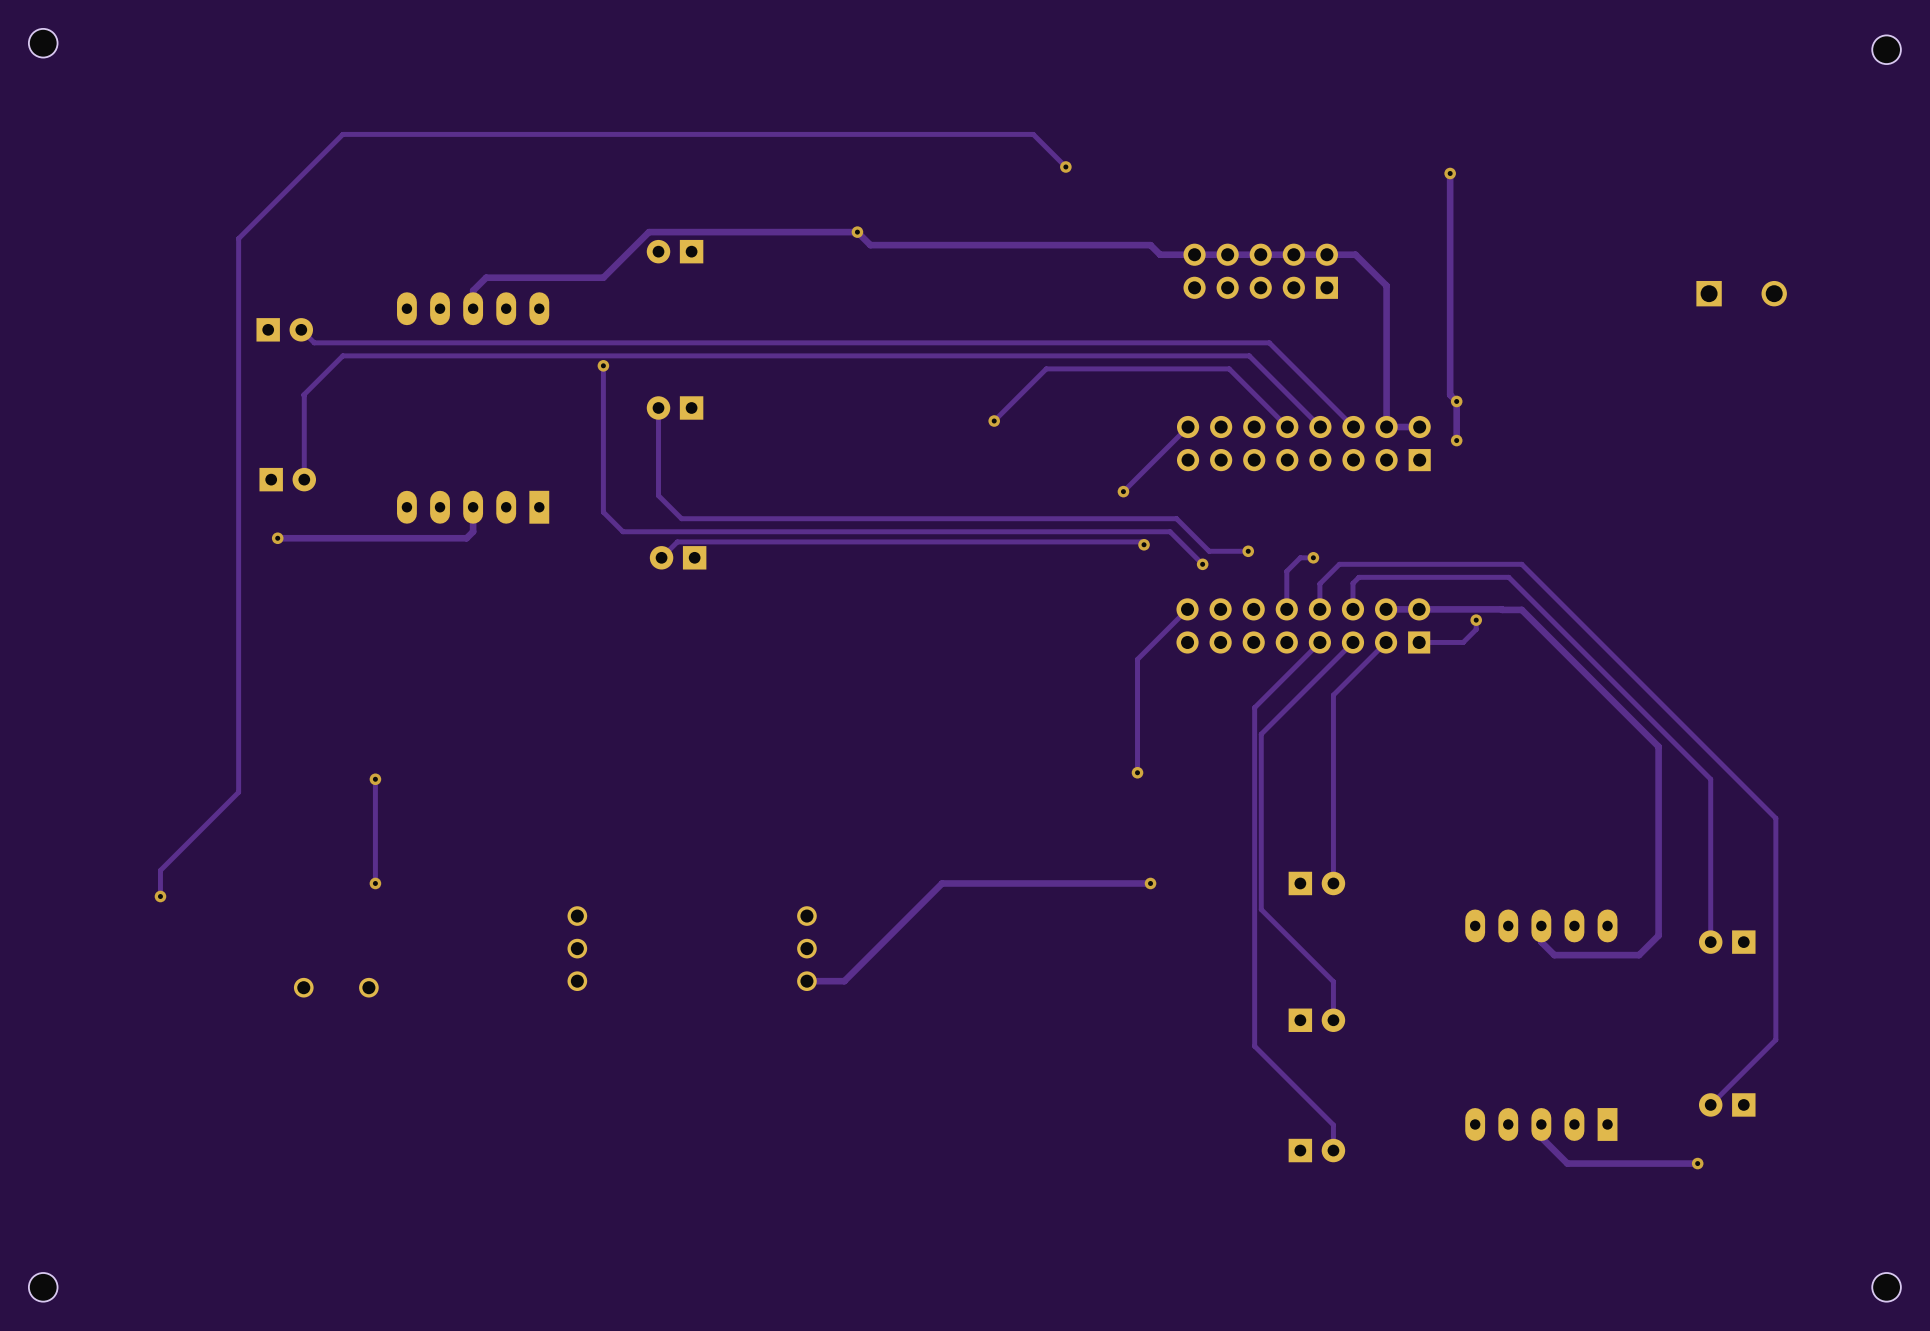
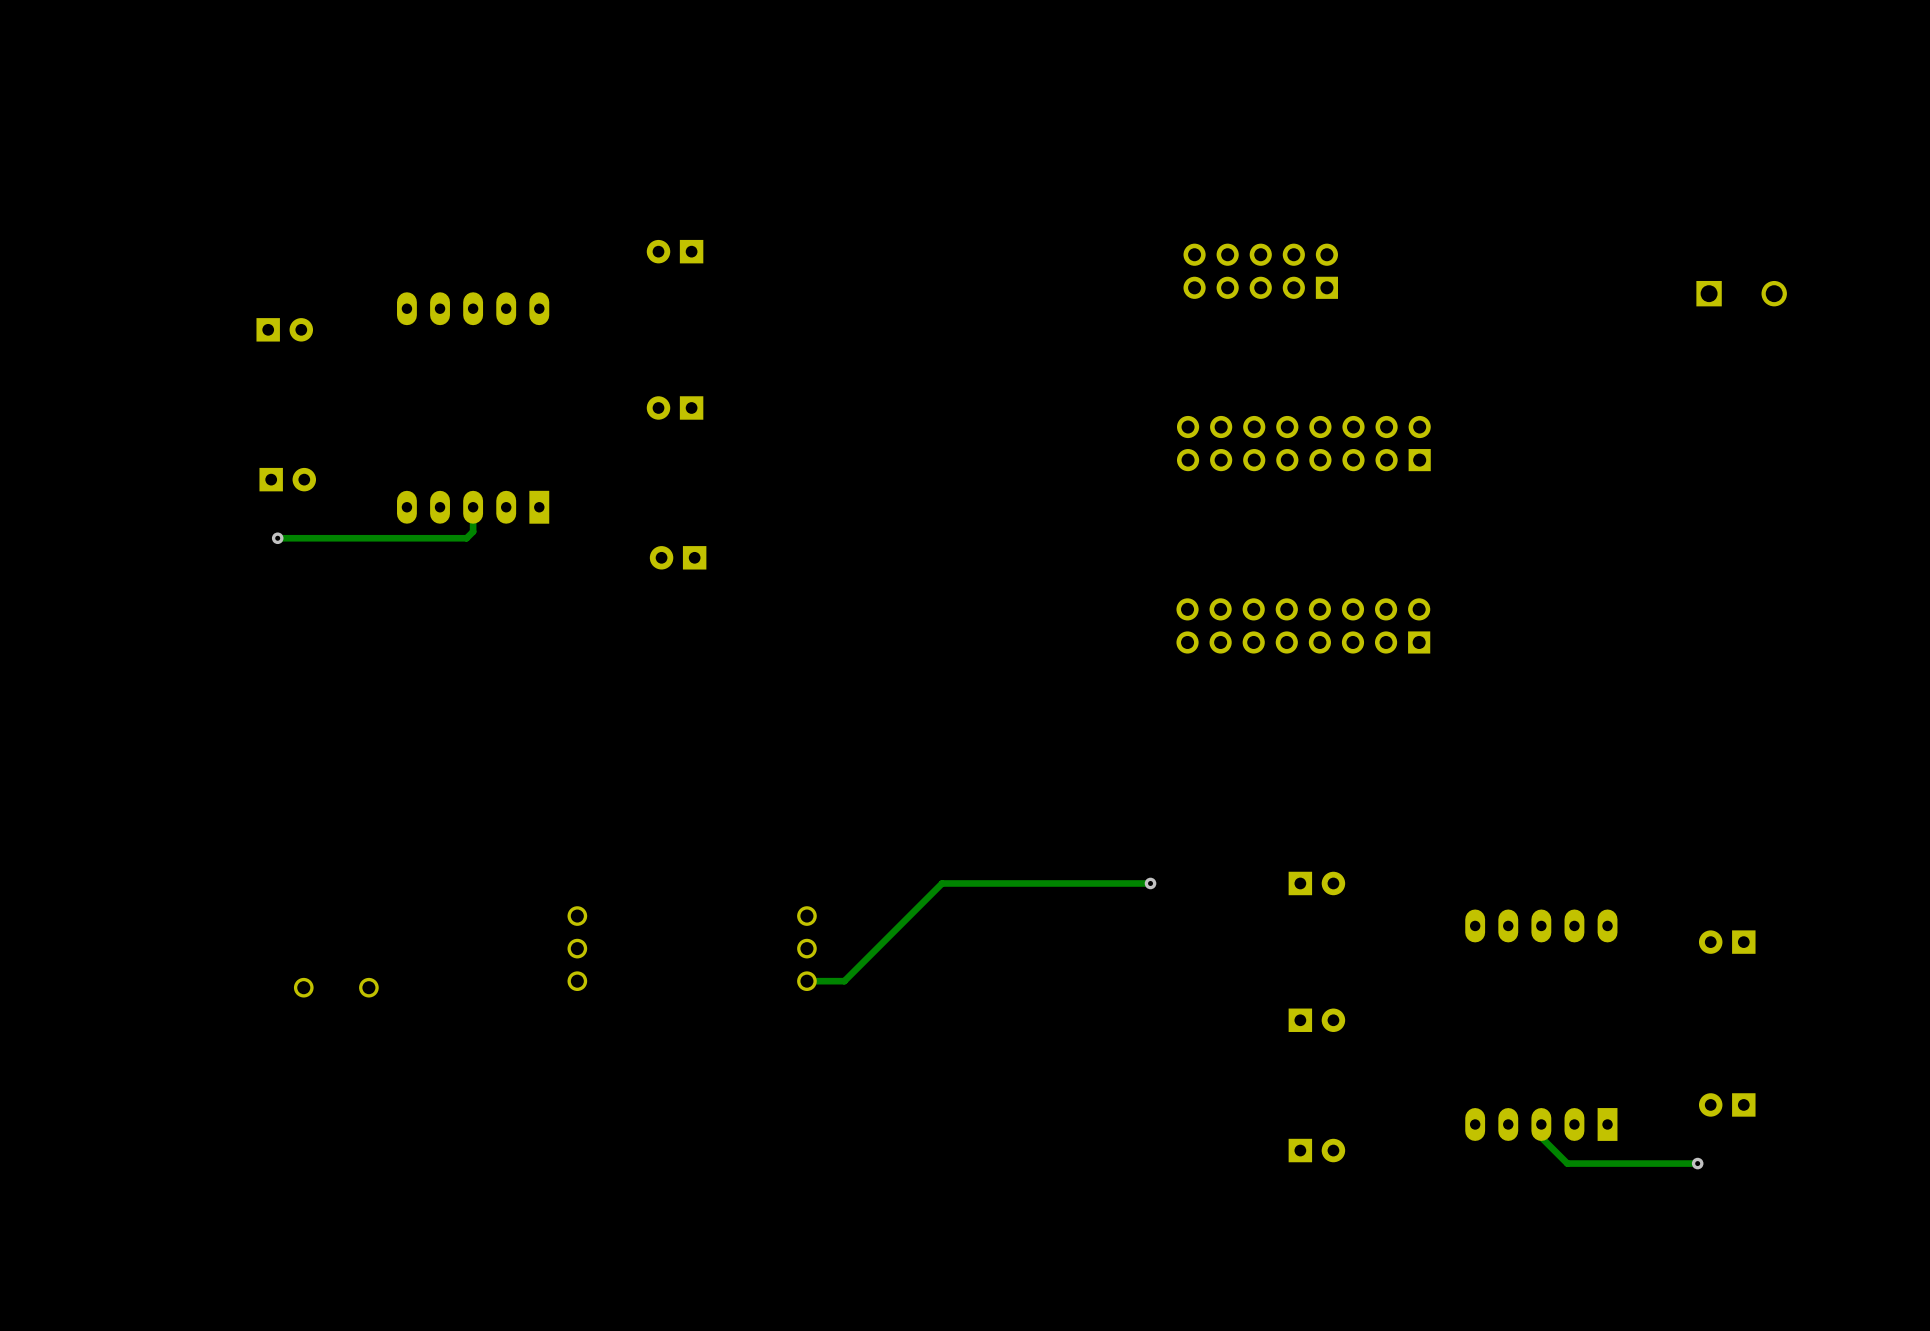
part: (43, 43) -> none
part: (1886, 49) -> none
track: (1065, 166) (1033, 134) (342, 134) (238, 238) (238, 792) (160, 870) (160, 896) -> none
via: (1065, 166) -> none
track: (1450, 173) (1450, 394) (1456, 401) (1456, 440) -> none
via: (1450, 173) -> none
via: (857, 232) -> none
track: (473, 308) (473, 290) (486, 277) (603, 277) (648, 232) (857, 232) (870, 245) (1150, 245) (1160, 254) (1355, 254) (1386, 285) (1386, 427) (1419, 427) -> none
track: (301, 329) (314, 342) (1269, 342) (1353, 427) -> none
track: (603, 365) (603, 512) (622, 531) (1170, 531) (1202, 564) -> none
via: (603, 365) -> none
via: (1456, 401) -> none
track: (658, 407) (658, 495) (681, 518) (1176, 518) (1209, 551) (1248, 551) -> none
track: (994, 421) (1046, 368) (1229, 368) (1287, 427) -> none
via: (994, 421) -> none
track: (1188, 427) (1123, 491) -> none
track: (1320, 427) (1249, 355) (342, 355) (303, 394) (304, 479) -> none
via: (1456, 440) -> none
via: (1123, 491) -> none
track: (1144, 544) (1141, 541) (677, 541) (661, 557) -> none
via: (1144, 544) -> none
via: (1248, 551) -> none
track: (1313, 557) (1300, 557) (1286, 571) (1286, 609) -> none
via: (1313, 557) -> none
via: (1202, 564) -> none
track: (1187, 609) (1137, 659) (1137, 772) -> none
track: (1319, 609) (1319, 583) (1339, 564) (1521, 564) (1775, 818) (1775, 1039) (1710, 1104) -> none
track: (1352, 609) (1352, 583) (1358, 577) (1508, 577) (1710, 779) (1710, 942) -> none
track: (1386, 609) (1521, 609) (1658, 746) (1658, 935) (1639, 955) (1554, 955) (1541, 942) (1541, 925) -> none
track: (1476, 620) (1476, 629) (1463, 642) (1419, 642) -> none
via: (1476, 620) -> none
track: (1319, 642) (1254, 707) (1254, 1046) (1333, 1125) (1333, 1150) -> none
track: (1352, 642) (1261, 734) (1261, 909) (1333, 981) (1333, 1020) -> none
track: (1386, 642) (1333, 695) (1333, 883) -> none
via: (1137, 772) -> none
track: (375, 779) (375, 883) -> none
via: (375, 779) -> none
via: (375, 883) -> none
via: (160, 896) -> none
part: (43, 1287) -> none
part: (1886, 1287) -> none

